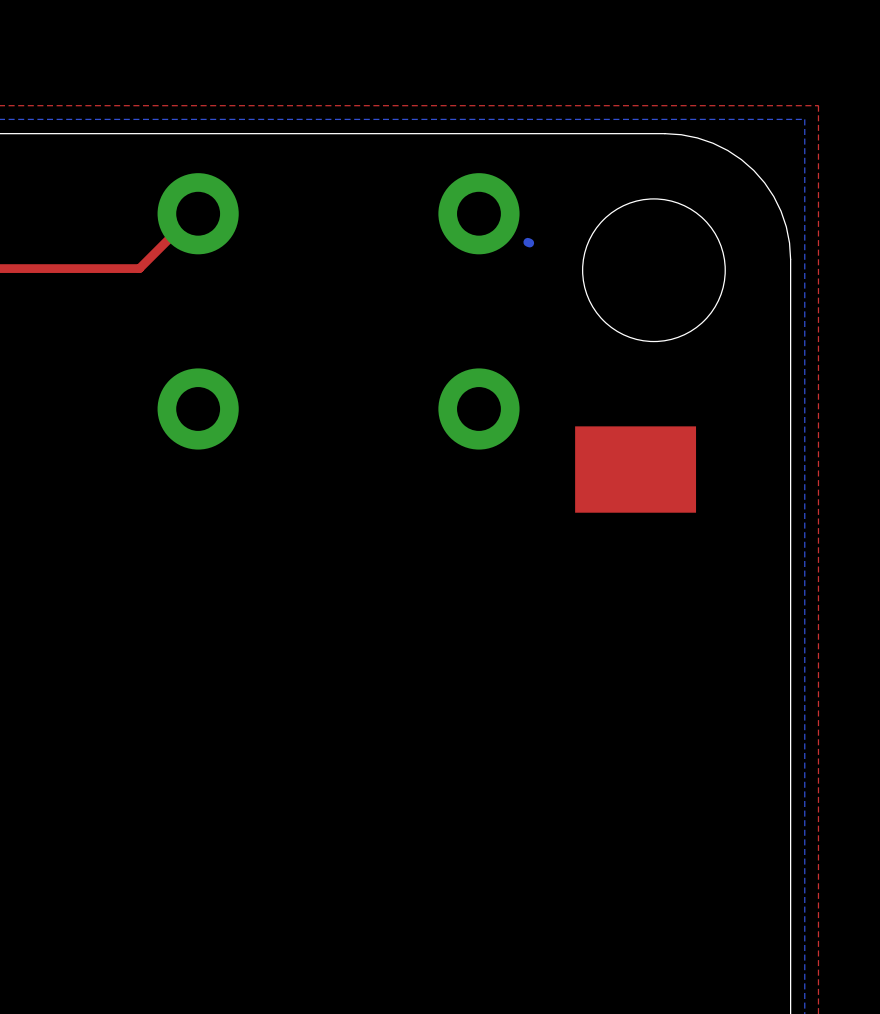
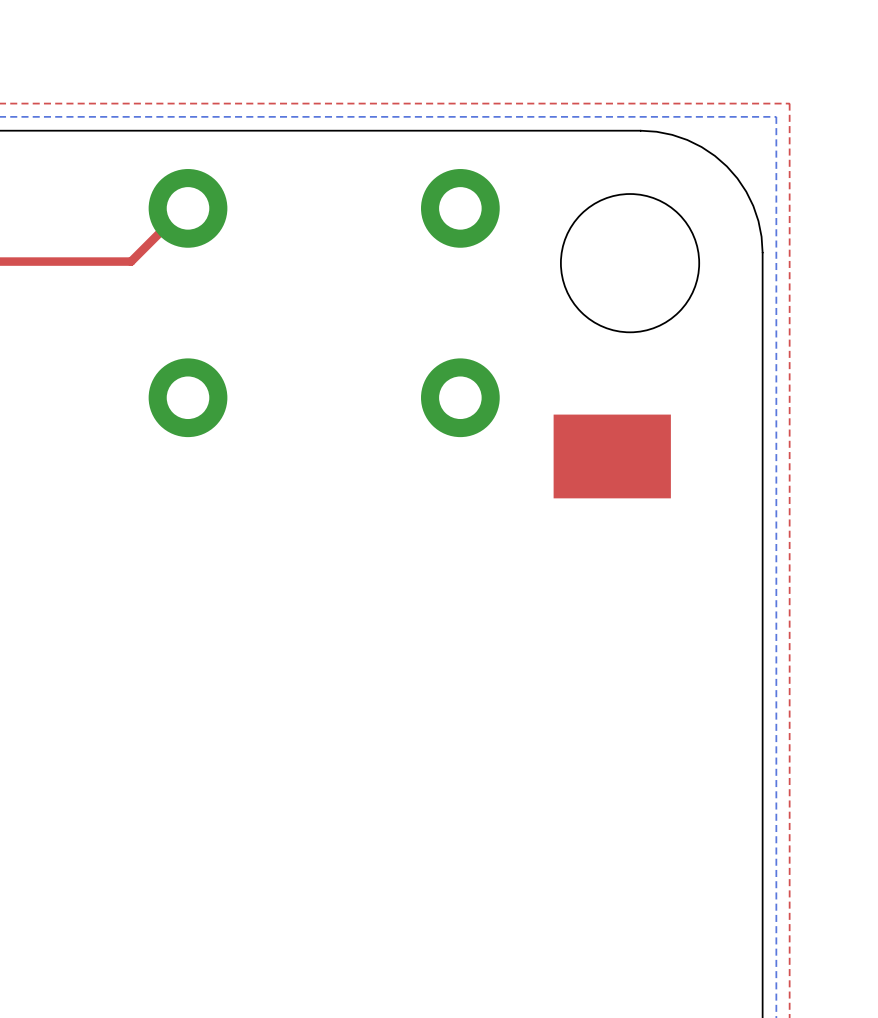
bottom track: (527, 242) (529, 243) -> none

